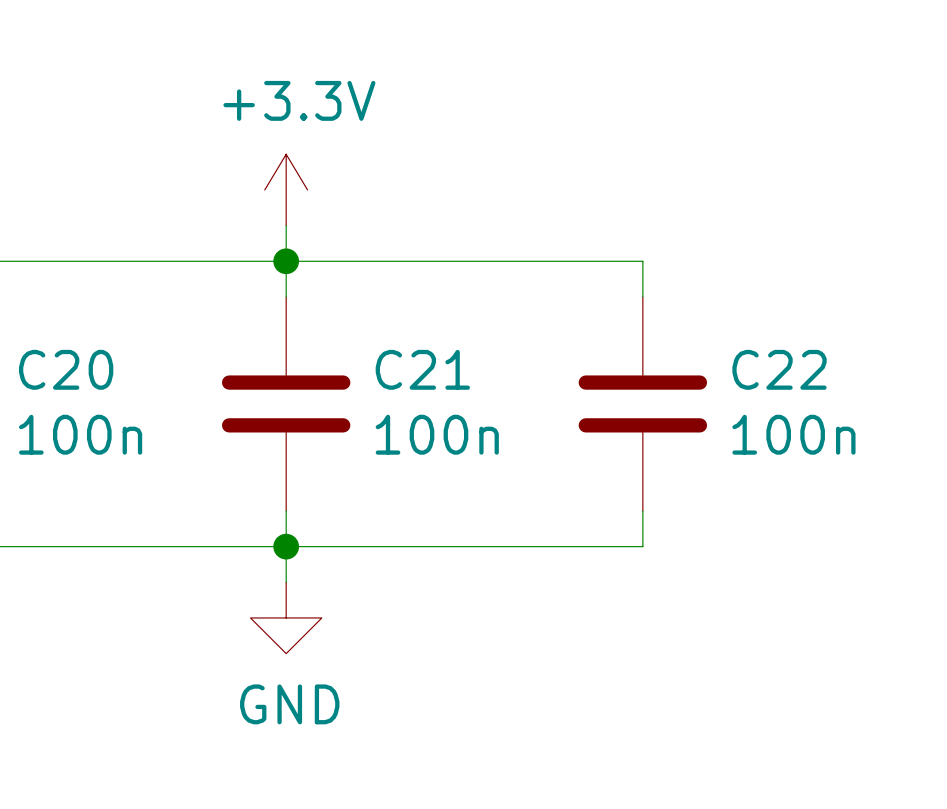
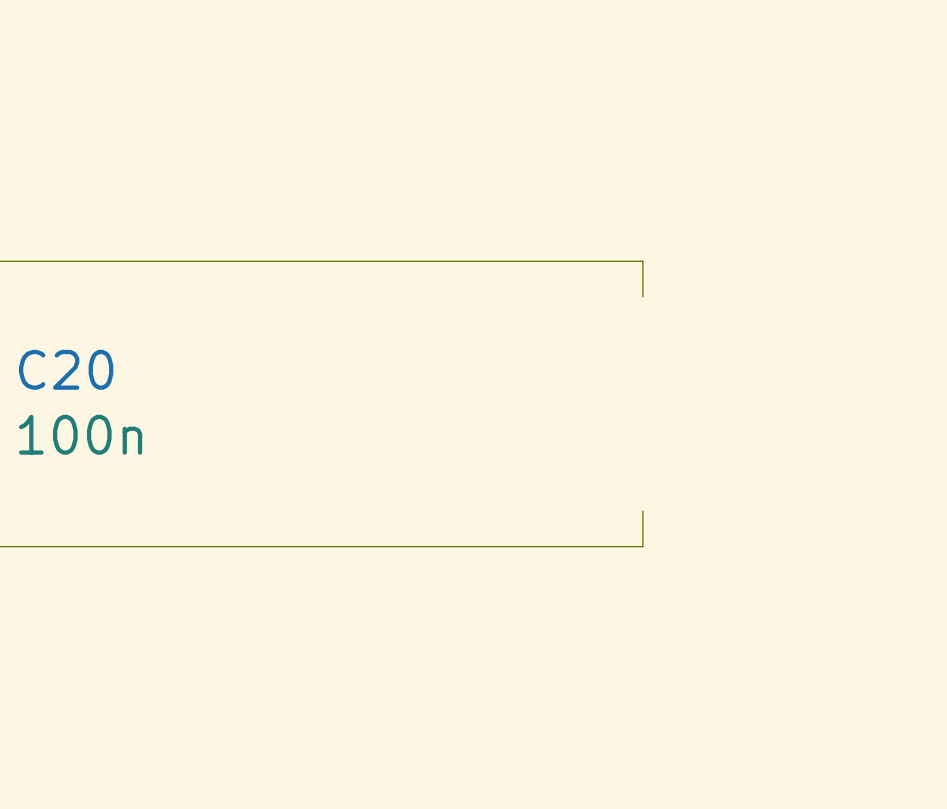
power symbol: +3.3V (286, 189) -> none
wire: (286, 225) (286, 296) -> none
junction: (286, 261) -> none
C21: 100n (286, 403) -> none
C22: 100n (642, 403) -> none
wire: (286, 510) (286, 582) -> none
junction: (286, 546) -> none
power symbol: GND (286, 617) -> none

